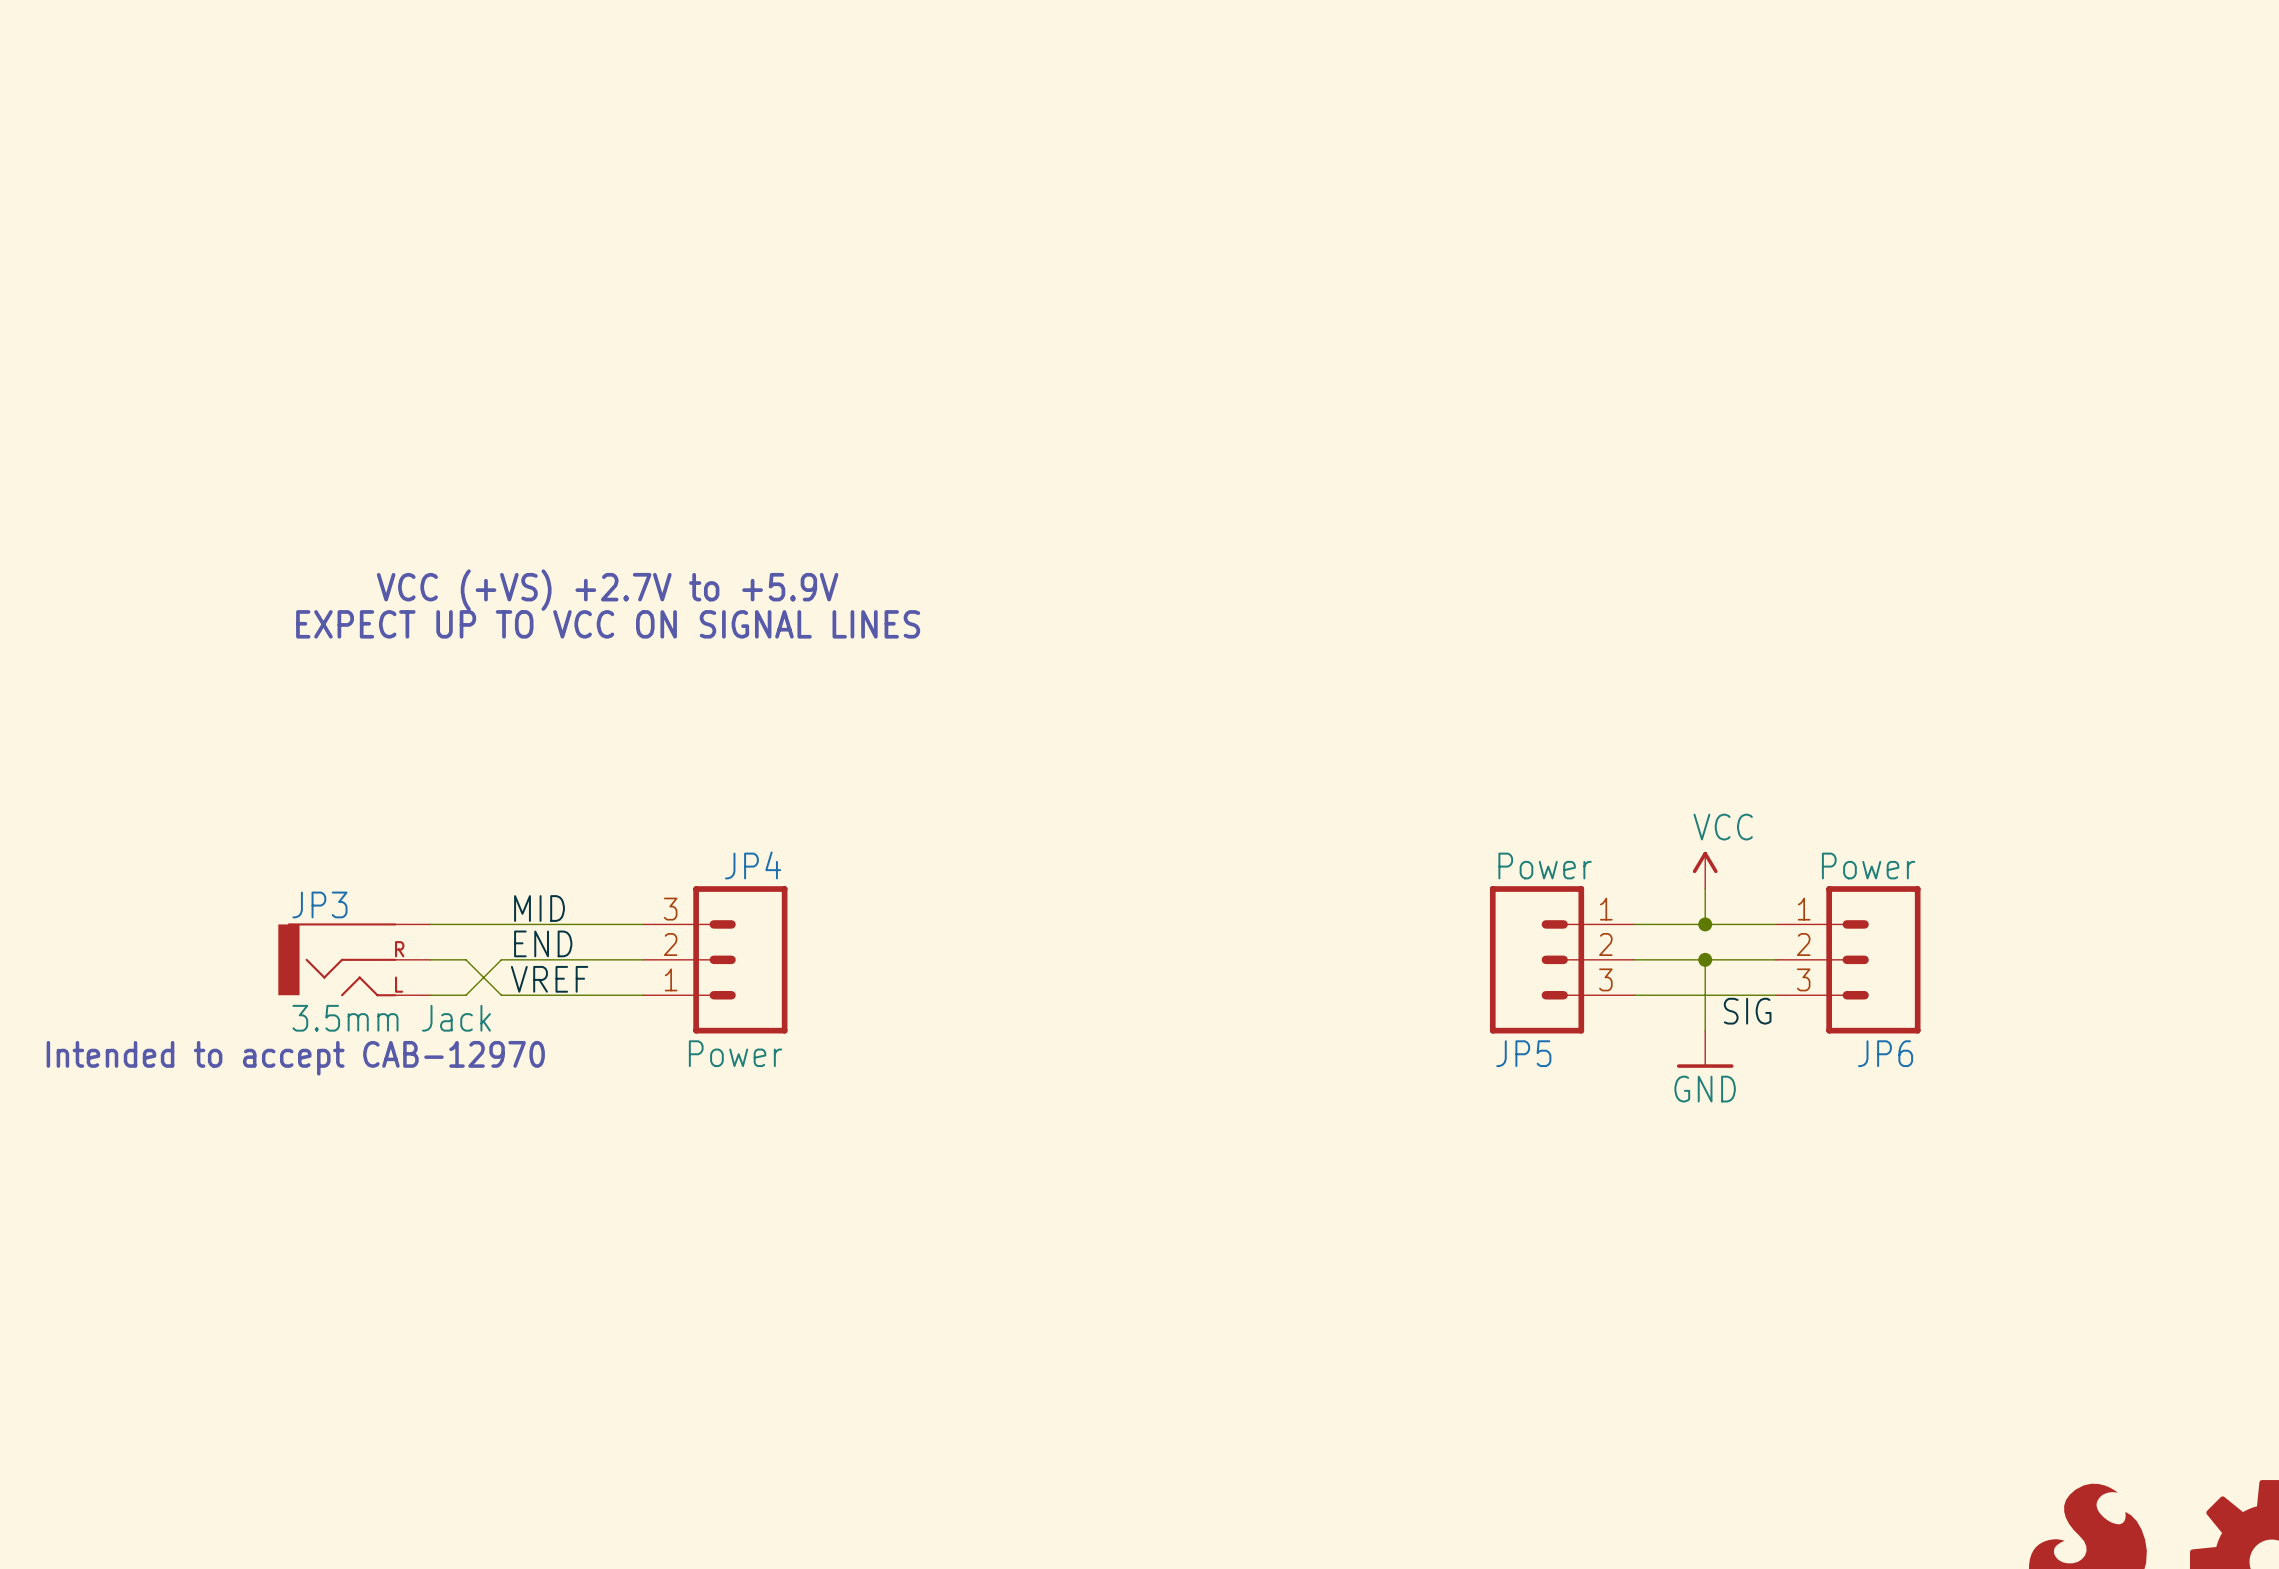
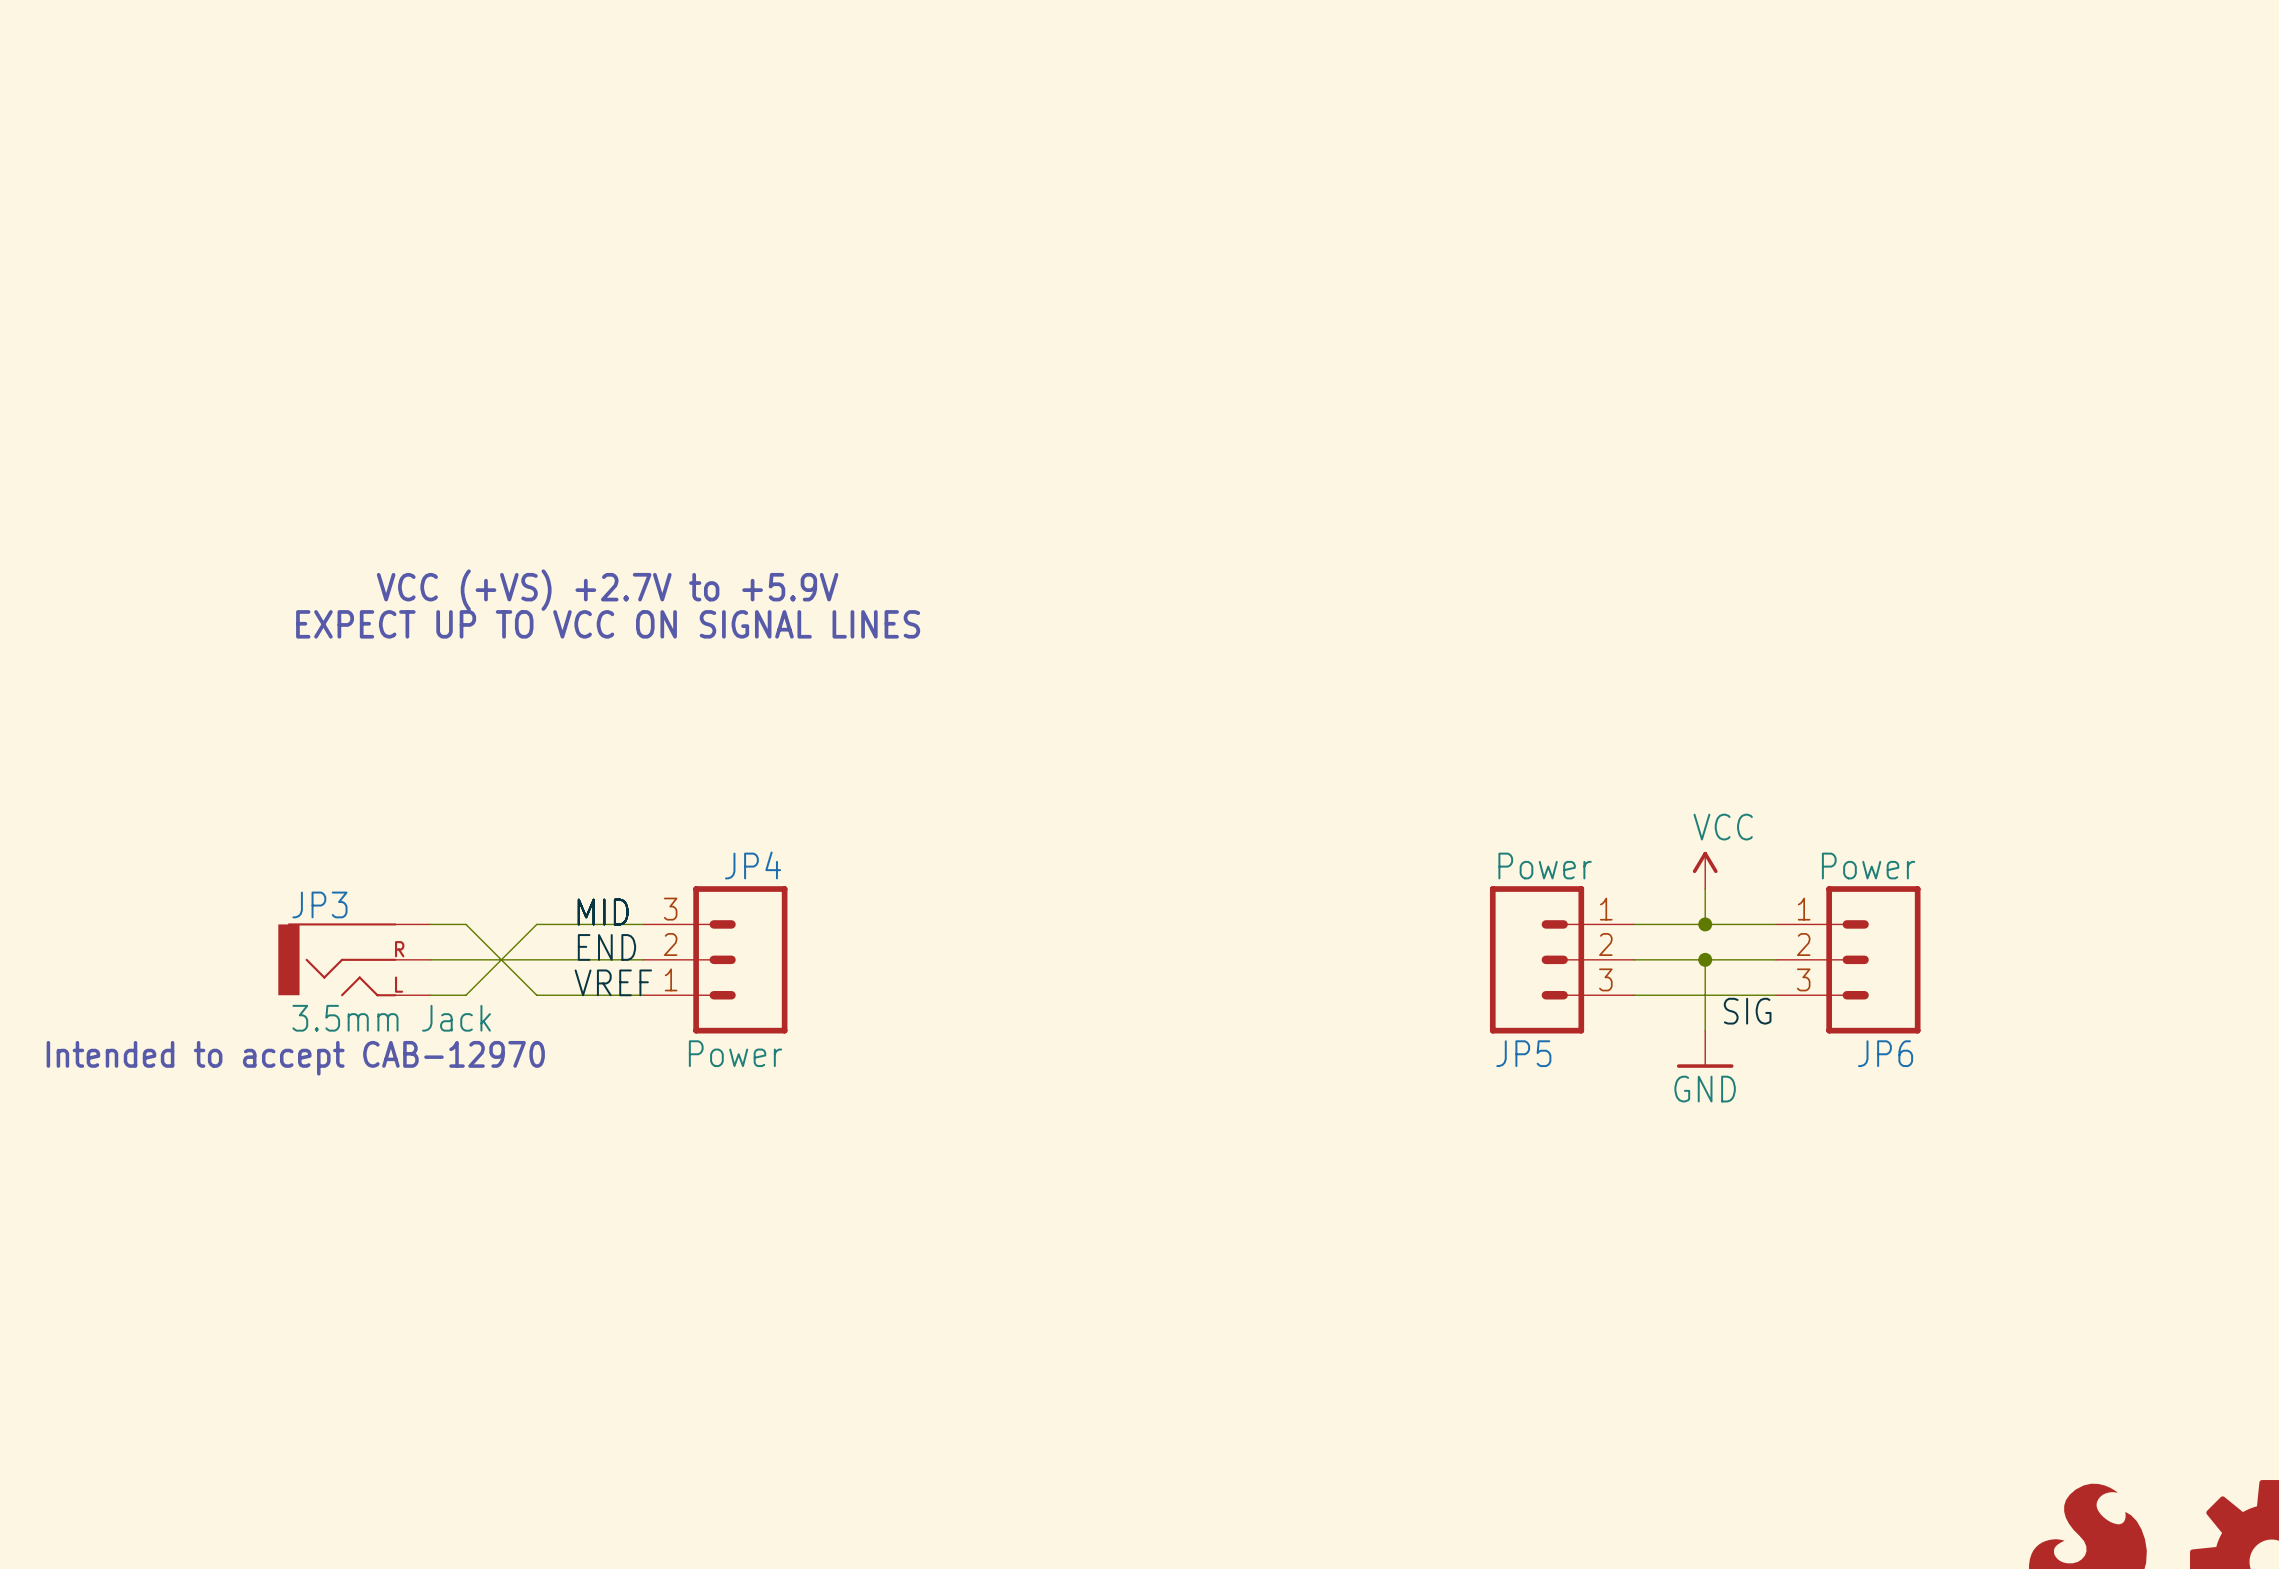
label position: MID (539, 908) -> MID (603, 912)
wire: (465, 924) (536, 924) -> (465, 959) (501, 959) (536, 924)
label position: END (543, 943) -> END (606, 947)
wire: (465, 959) (501, 995) (536, 995) -> (465, 924) (536, 995)
label position: VREF (549, 979) -> VREF (613, 982)

